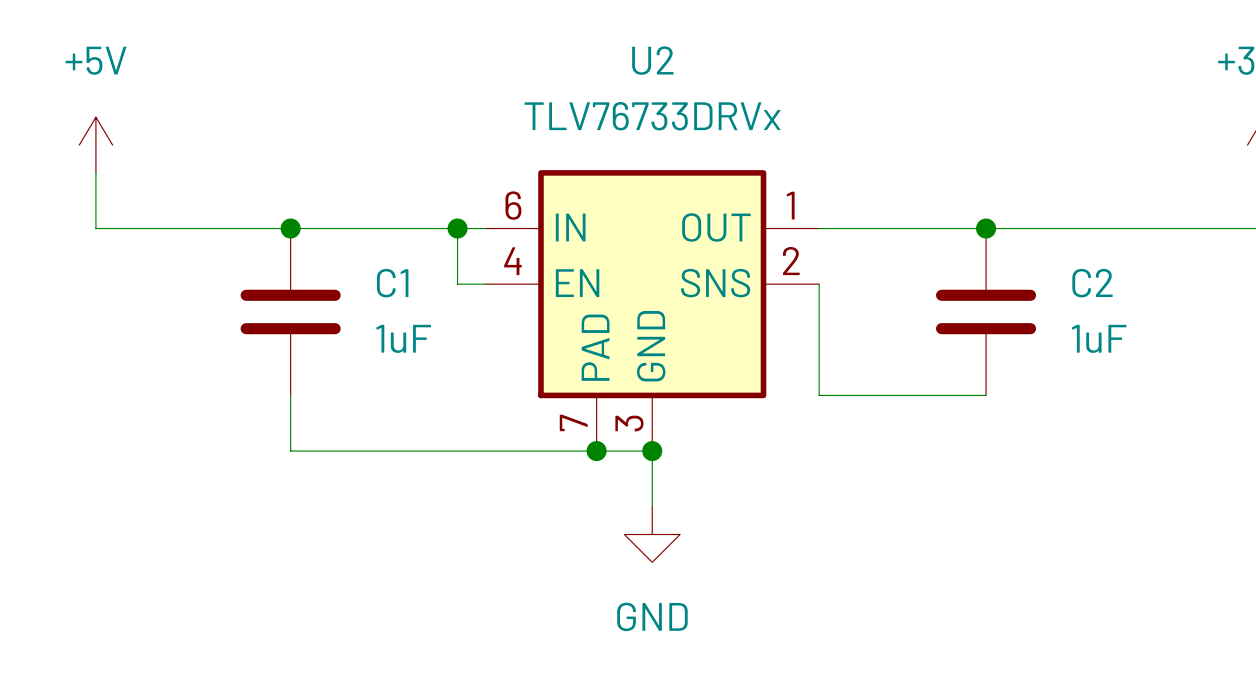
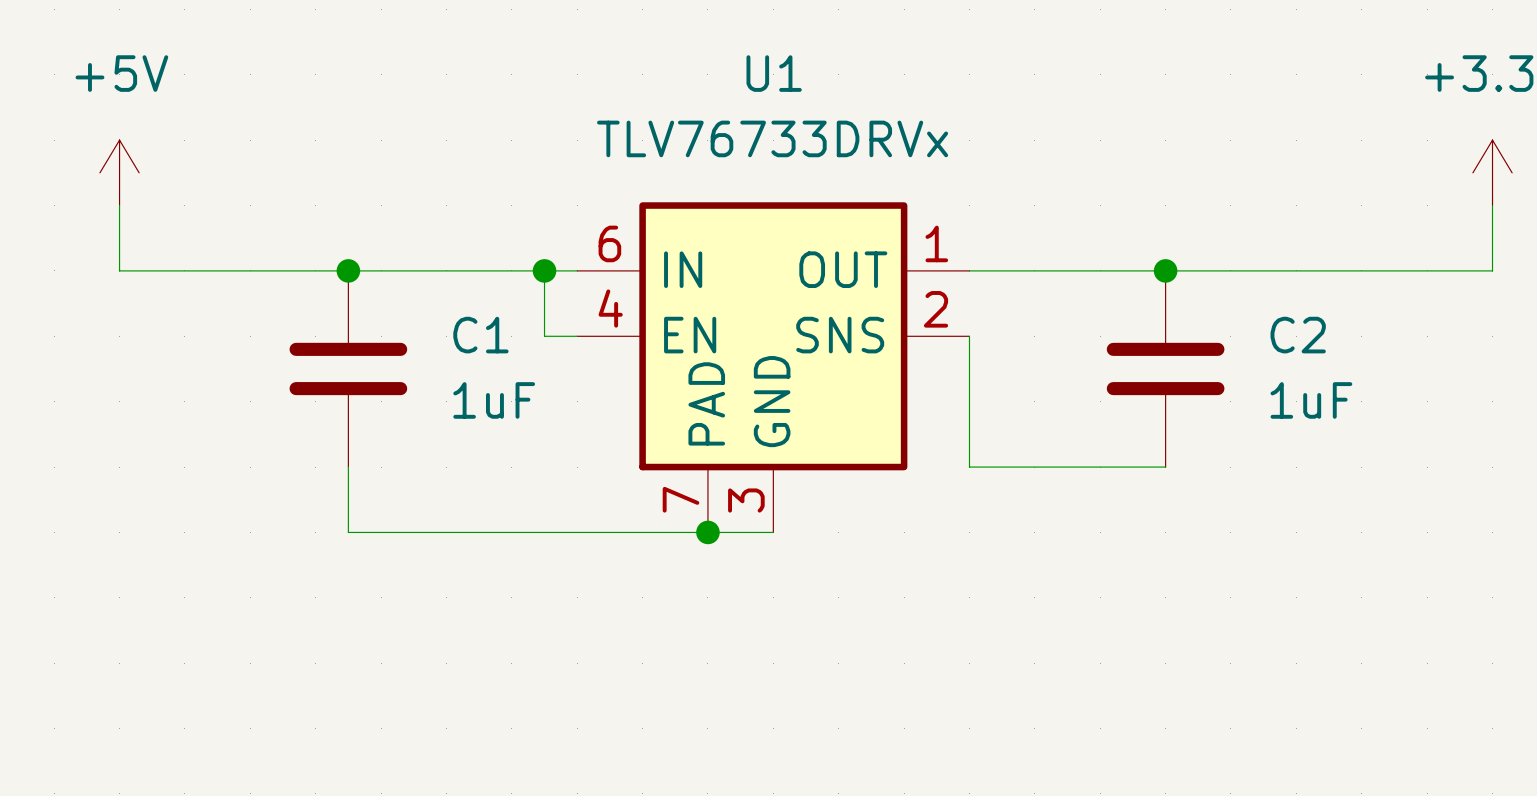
U2 name: U2 (652, 60) -> U1 (774, 73)
wire: (652, 451) (652, 506) -> none
junction: (652, 451) -> none
power symbol: GND (652, 534) -> none

